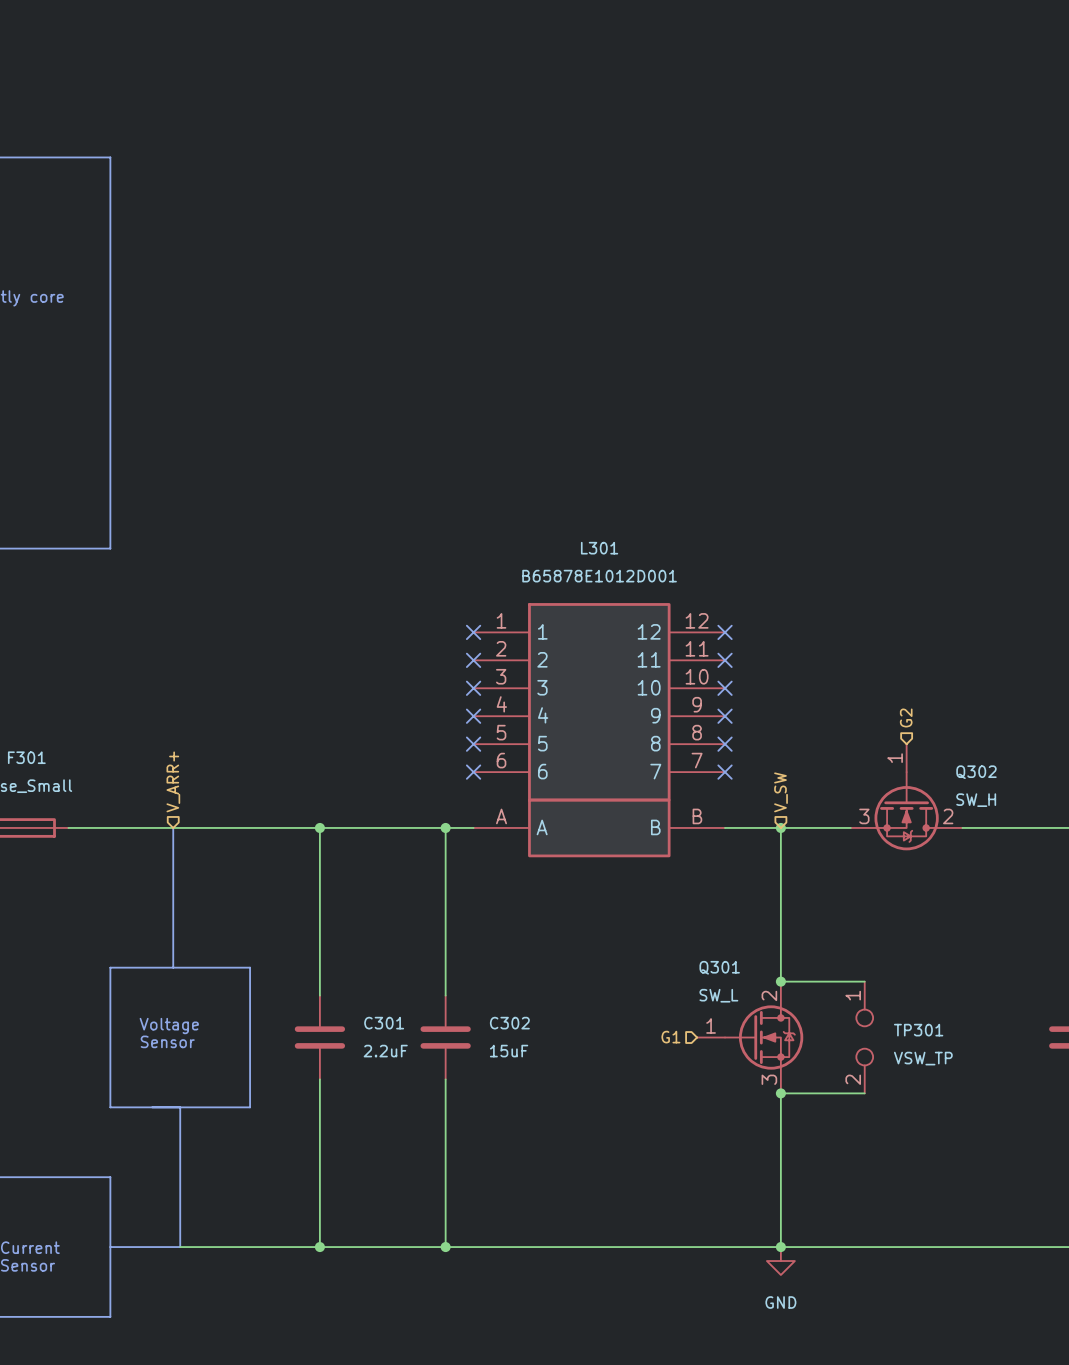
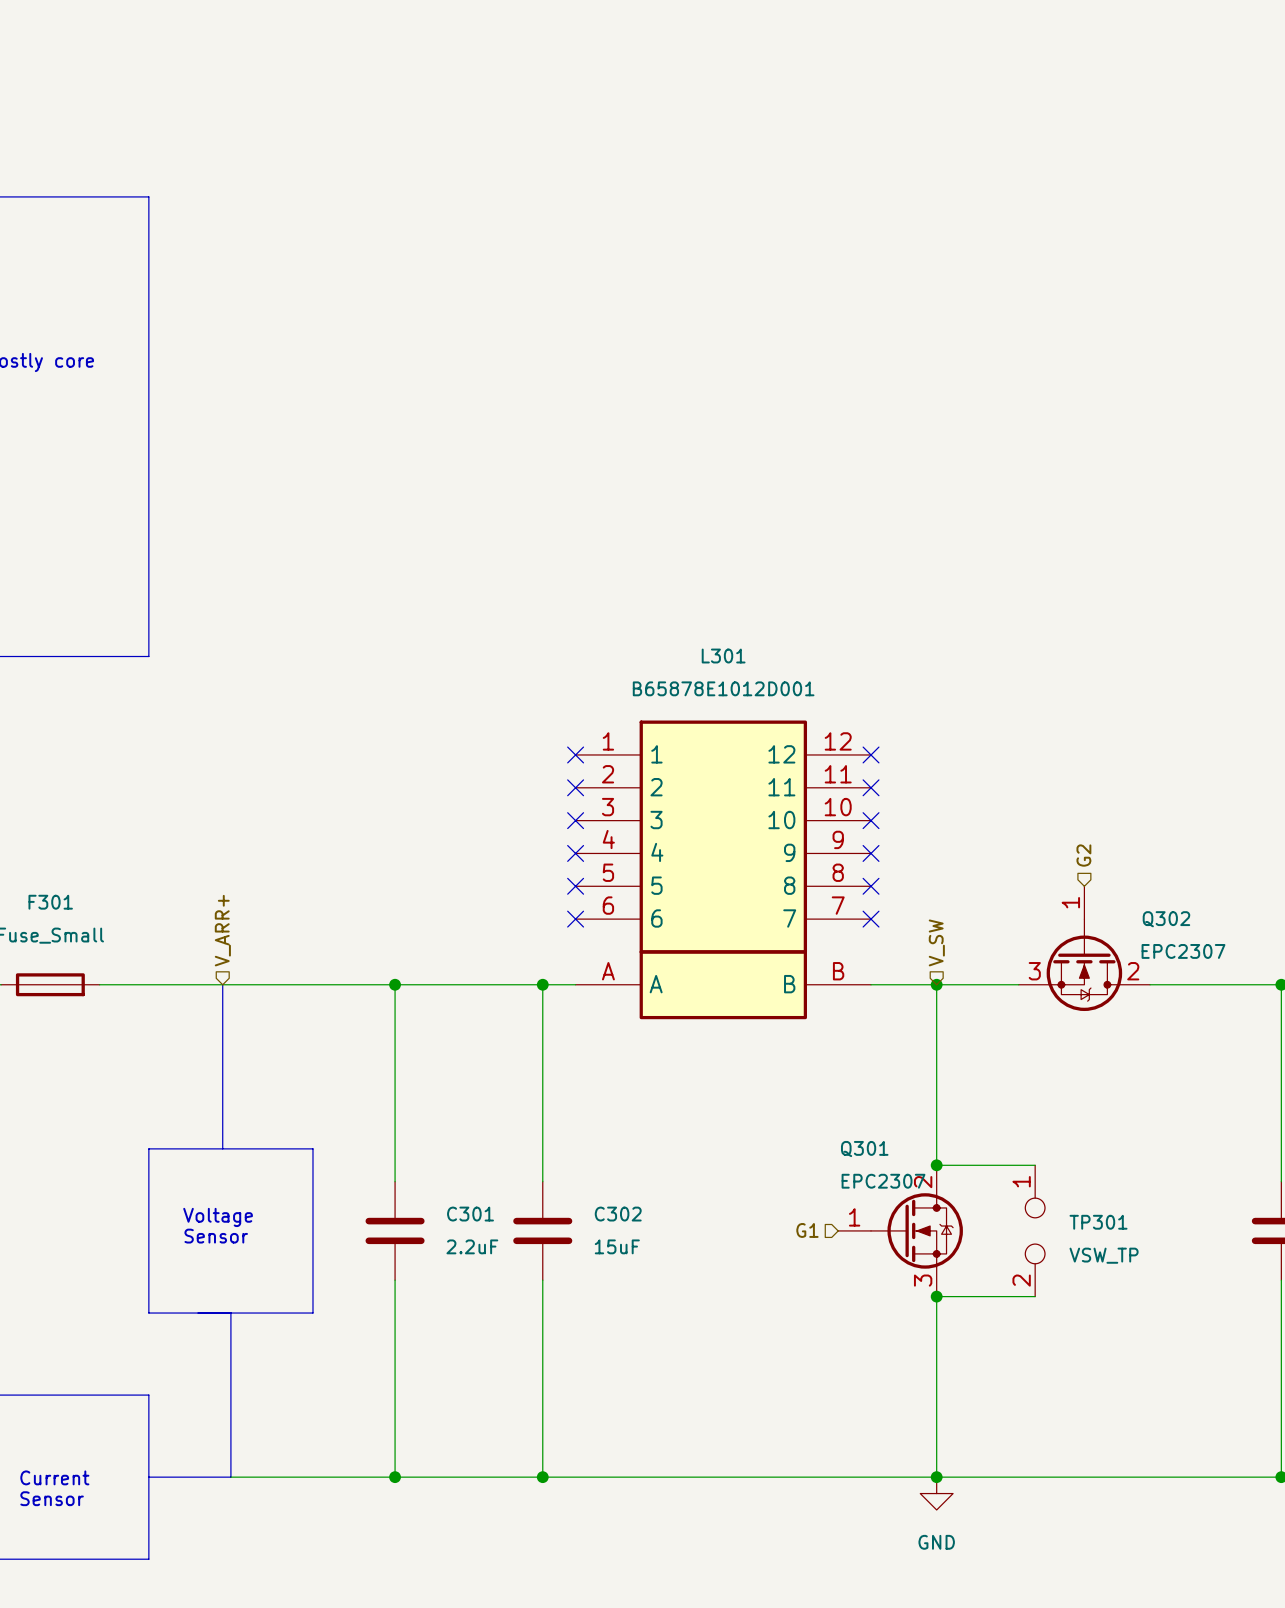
Q302 value: SW_H (976, 800) -> EPC2307 (1183, 951)
Q301 value: SW_L (718, 995) -> EPC2307 (883, 1181)

